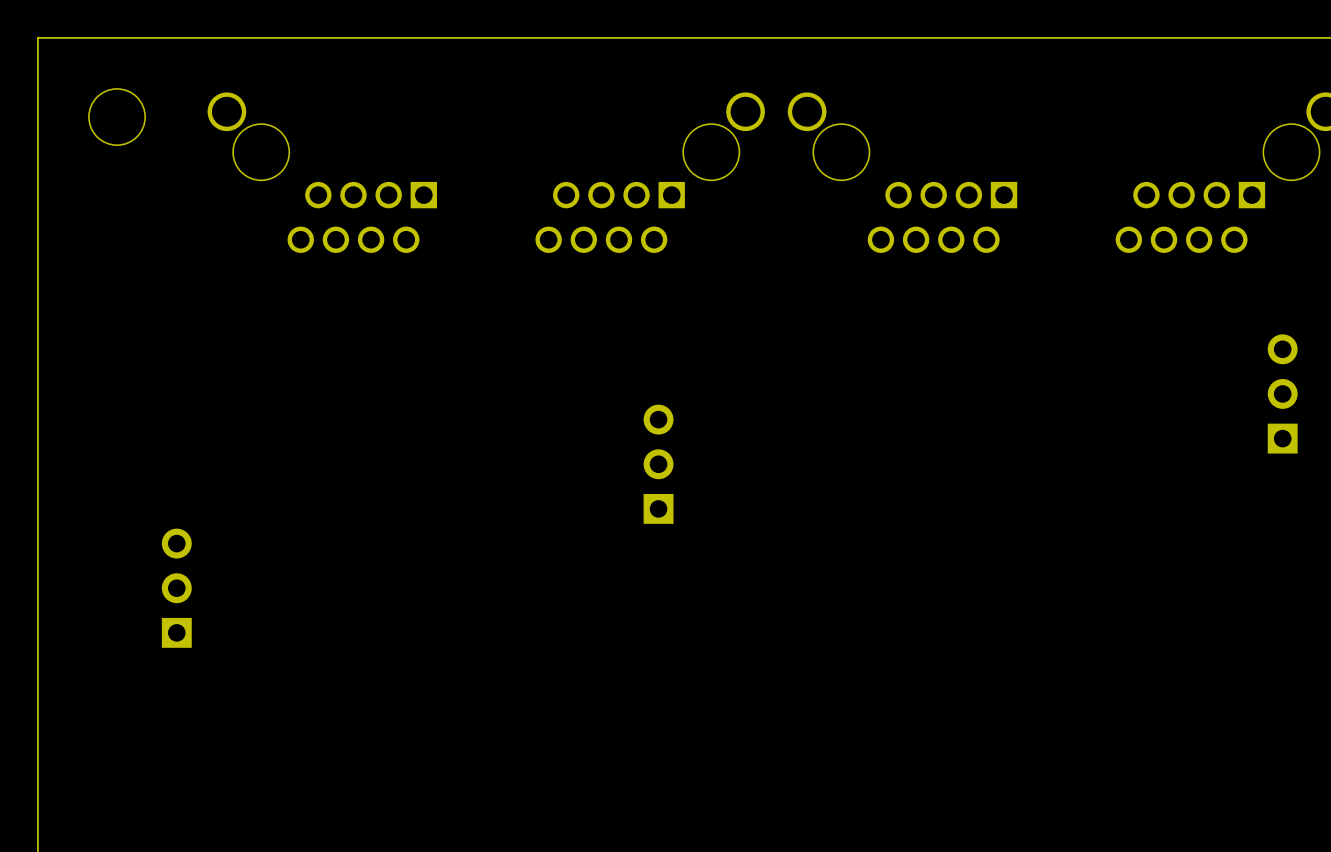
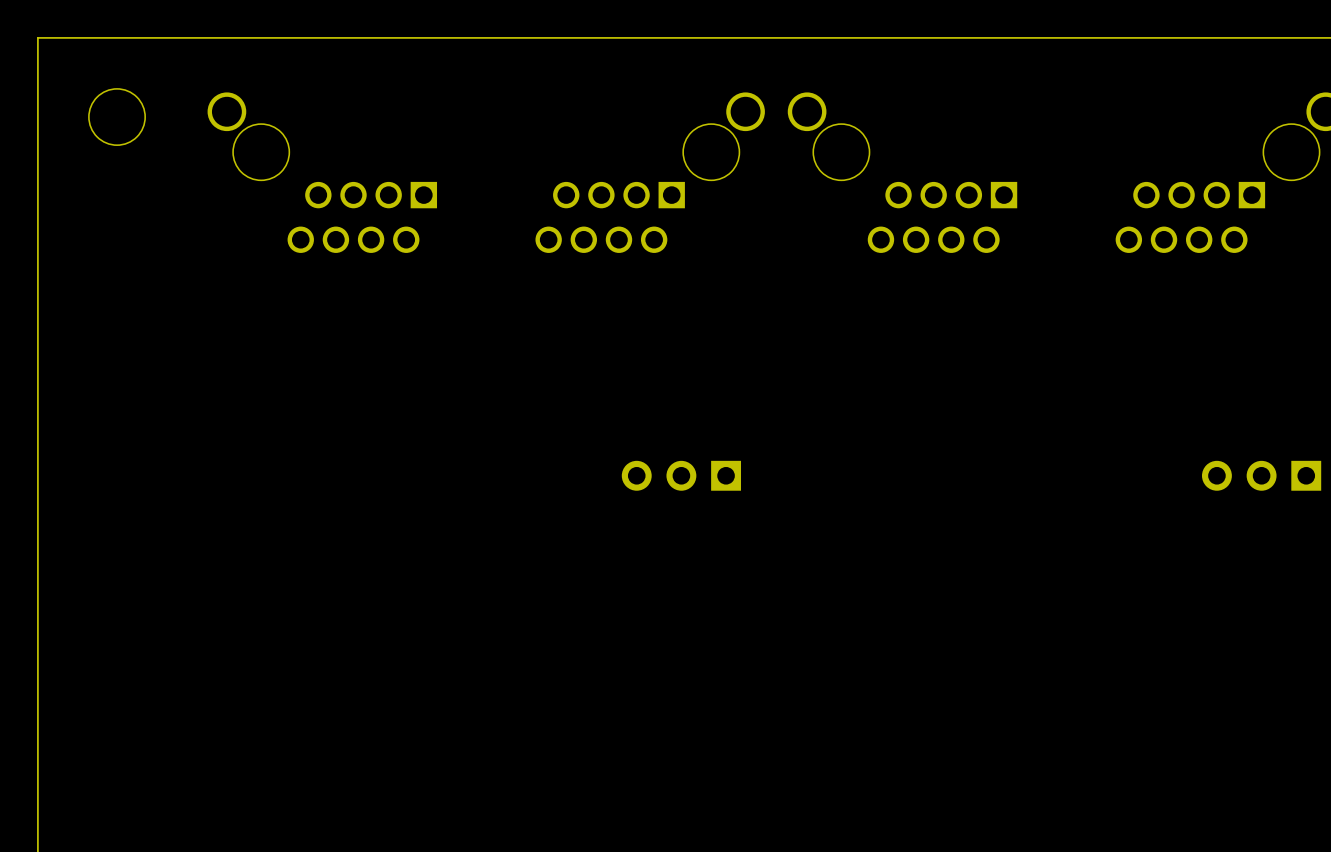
part rotation: 0° (1282, 393) -> 90° counterclockwise (1261, 475)
part position: (1282, 393) -> (1261, 475)
part rotation: 0° (658, 464) -> 90° counterclockwise (681, 475)
part: (176, 588) -> none

